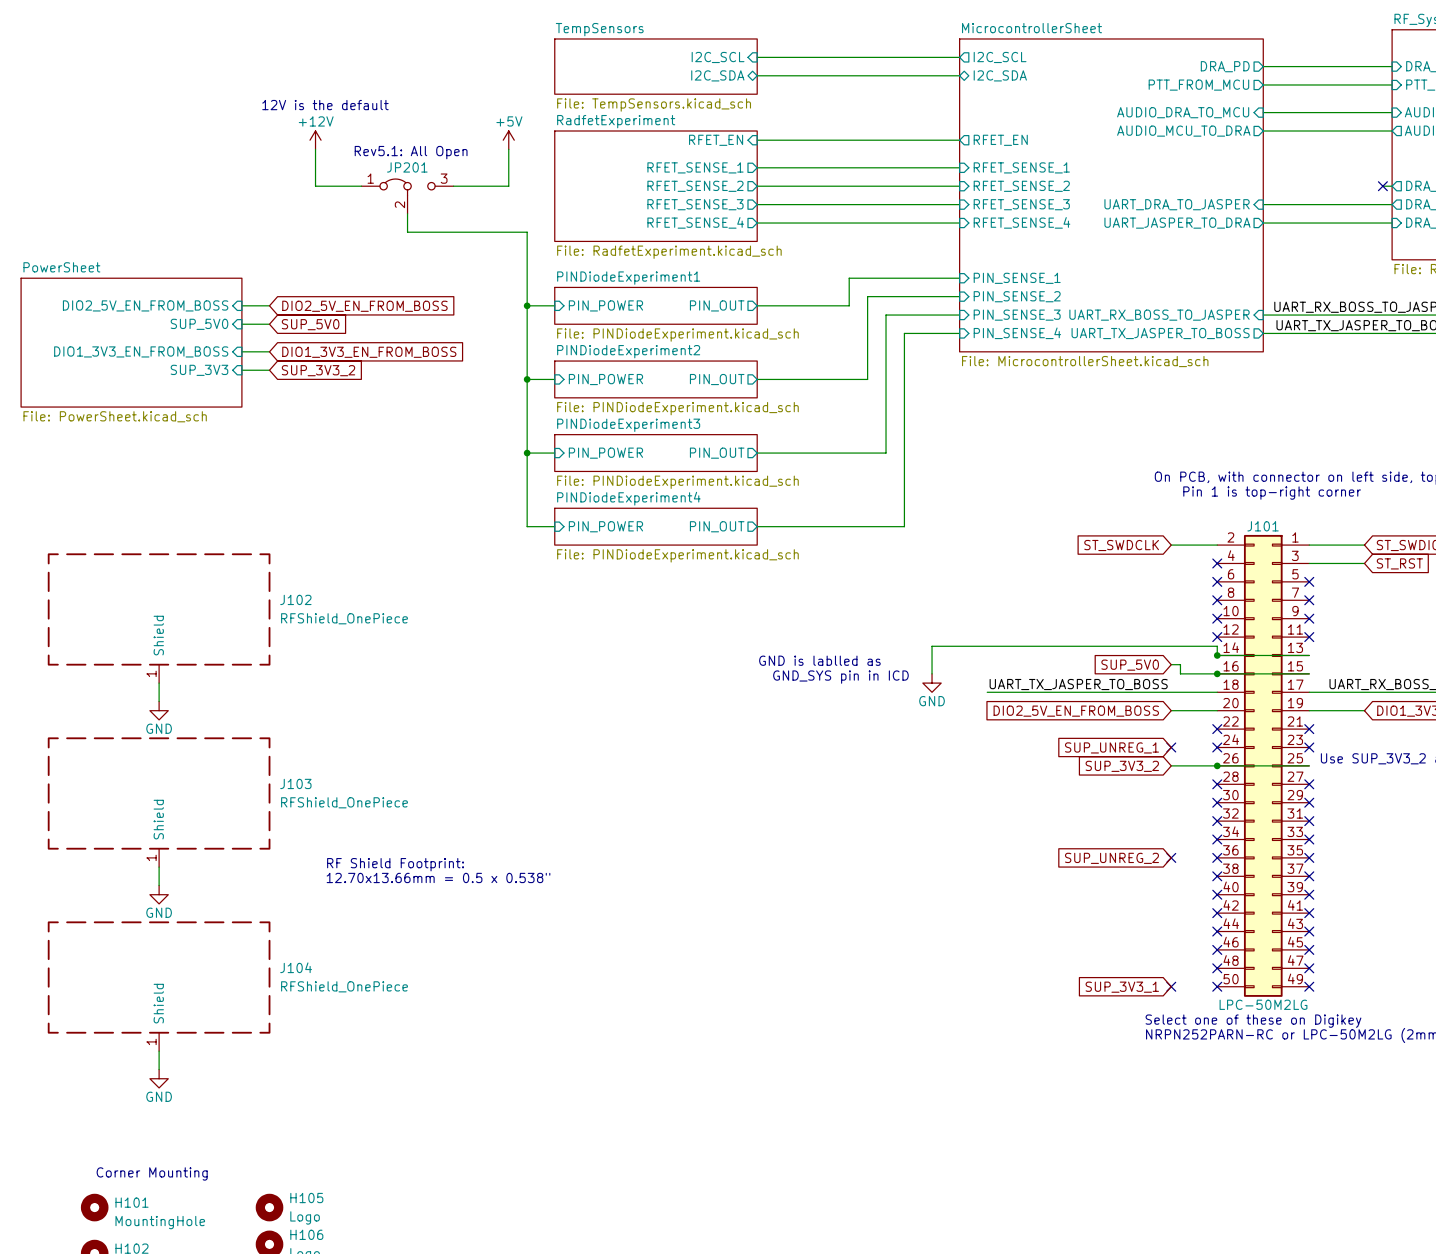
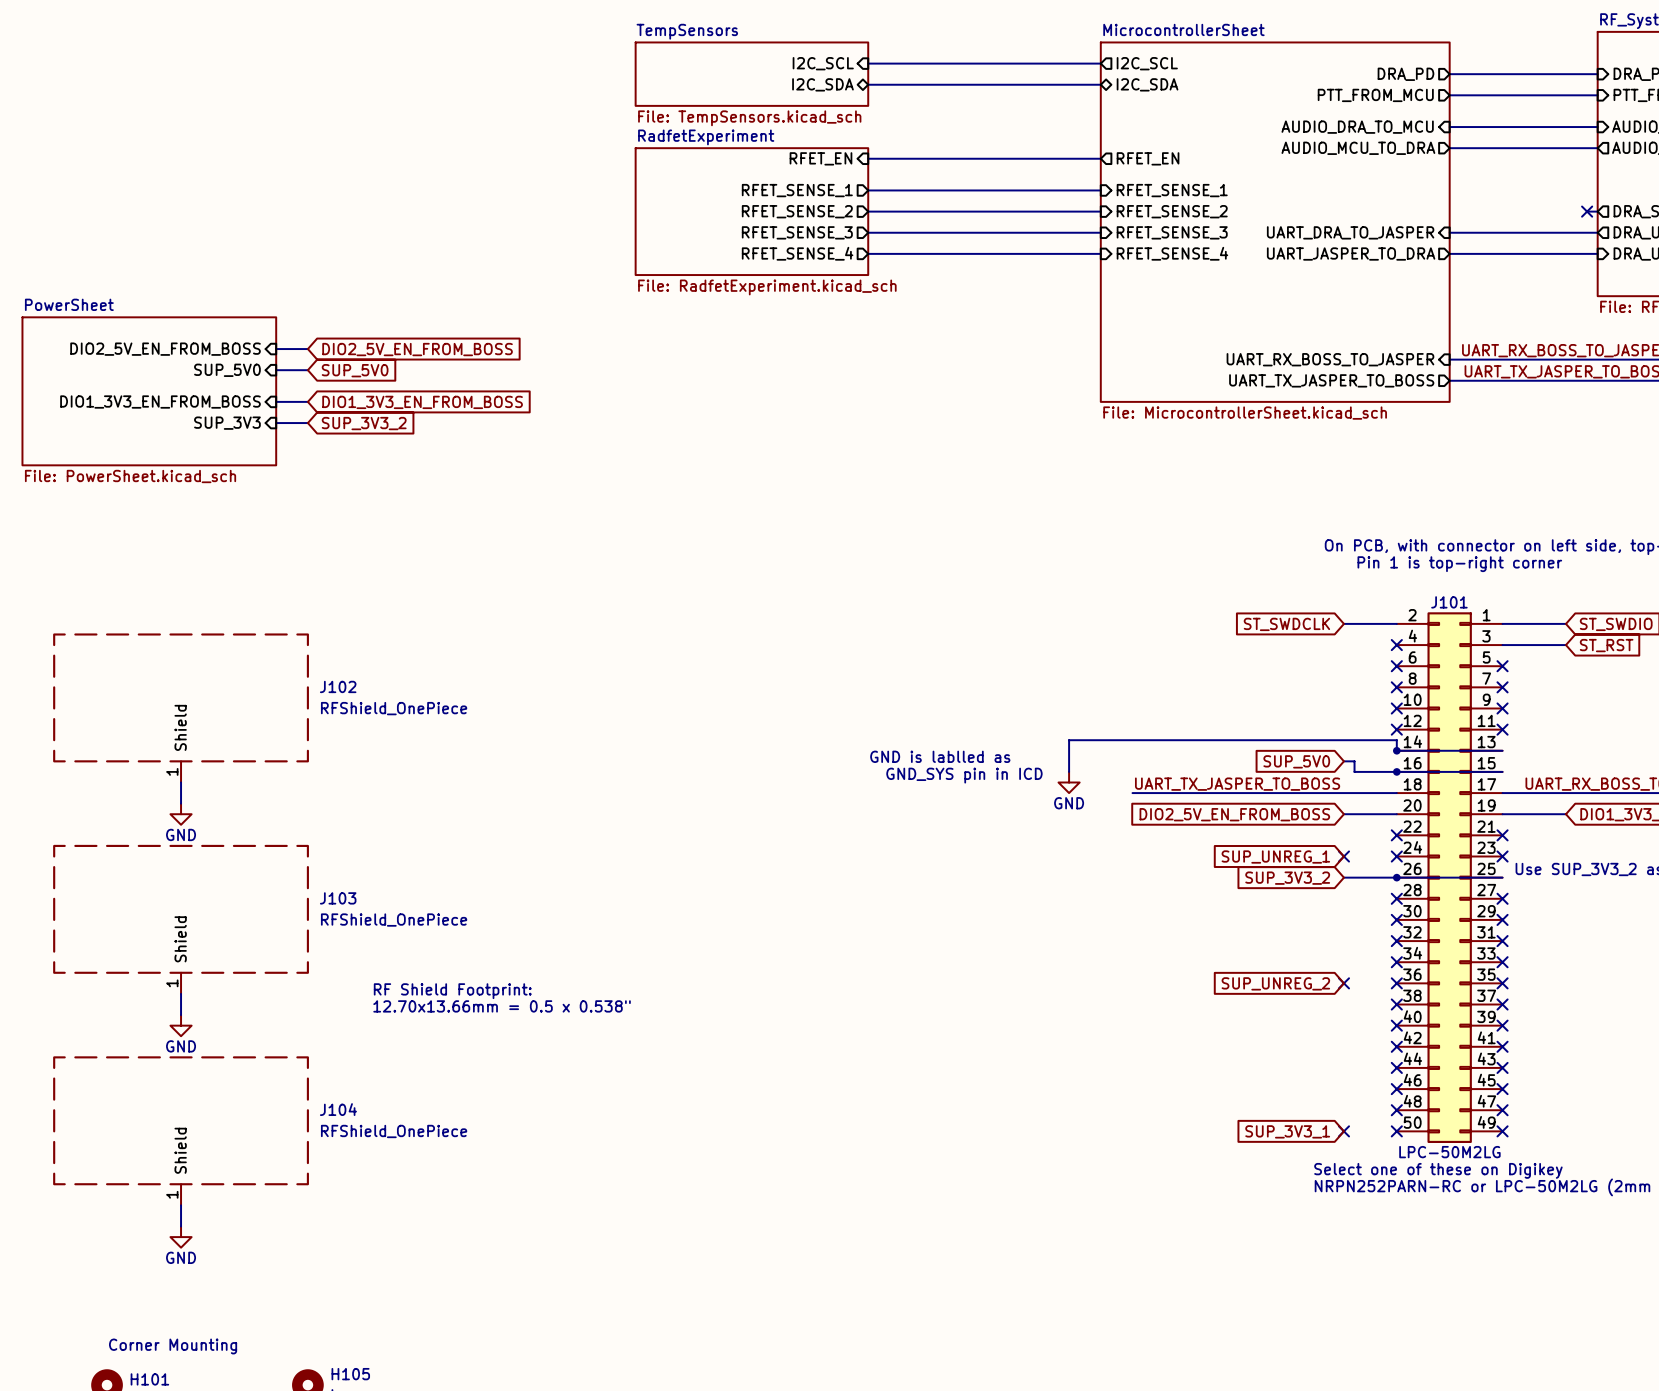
text: 12V is the default (325, 105) -> none
power symbol: +12V (315, 140) -> none
power symbol: +5V (508, 140) -> none
wire: (315, 149) (315, 186) (361, 186) -> none
wire: (508, 149) (508, 186) (453, 186) -> none
text: Rev5.1: All Open (411, 152) -> none
JP201: (407, 196) -> none
wire: (407, 213) (407, 232) (527, 232) (527, 526) (554, 526) -> none
wire: (959, 278) (849, 278) (849, 305) (757, 305) -> none
sheet pin: PIN_SENSE_1 (1017, 278) -> none
wire: (959, 296) (867, 296) (867, 379) (757, 379) -> none
sheet pin: PIN_SENSE_2 (1017, 296) -> none
wire: (527, 305) (554, 305) -> none
junction: (527, 305) -> none
sheet pin: PIN_POWER (605, 305) -> none
sheet PINDiodeExperiment1: File: PINDiodeExperiment.kicad_sch (655, 305) -> none
sheet pin: PIN_OUT (717, 305) -> none
wire: (959, 315) (886, 315) (886, 453) (757, 453) -> none
sheet pin: PIN_SENSE_3 (1017, 315) -> none
wire: (959, 333) (904, 333) (904, 526) (757, 526) -> none
sheet pin: PIN_SENSE_4 (1017, 333) -> none
wire: (527, 379) (554, 379) -> none
junction: (527, 379) -> none
sheet pin: PIN_POWER (605, 379) -> none
sheet PINDiodeExperiment2: File: PINDiodeExperiment.kicad_sch (655, 379) -> none
sheet pin: PIN_OUT (717, 379) -> none
wire: (527, 453) (554, 453) -> none
junction: (527, 453) -> none
sheet pin: PIN_POWER (605, 453) -> none
sheet PINDiodeExperiment3: File: PINDiodeExperiment.kicad_sch (655, 453) -> none
sheet pin: PIN_OUT (717, 453) -> none
sheet pin: PIN_POWER (605, 526) -> none
sheet PINDiodeExperiment4: File: PINDiodeExperiment.kicad_sch (655, 526) -> none
sheet pin: PIN_OUT (717, 526) -> none

